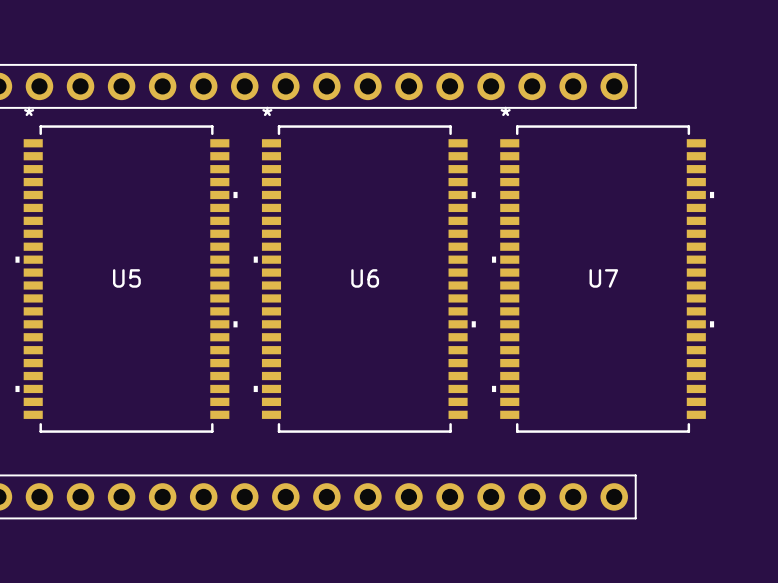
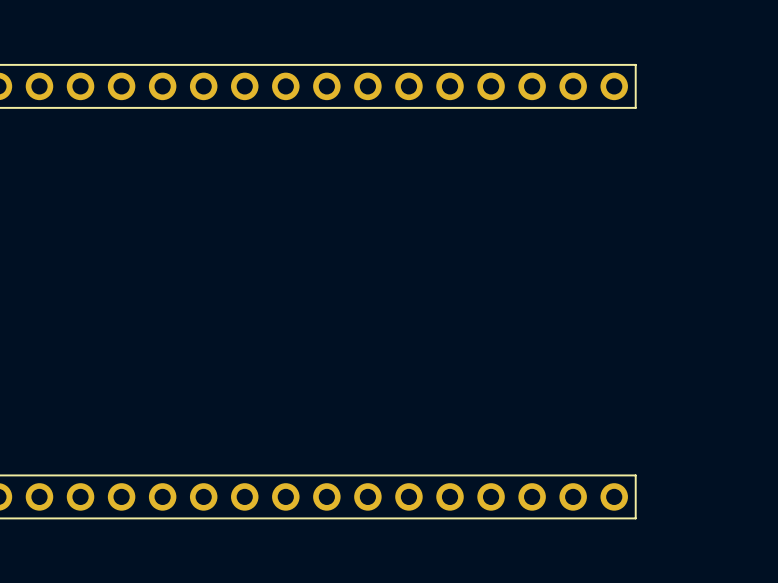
U5: (126, 279) -> none
U6: (364, 279) -> none
U7: (603, 279) -> none

